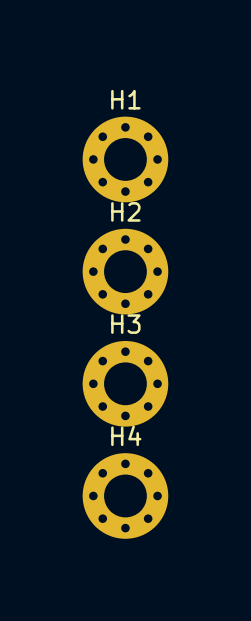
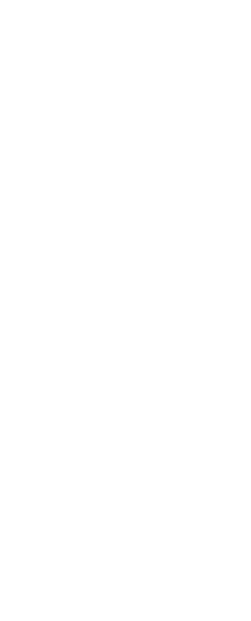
H1: (125, 159) -> none
H2: (125, 271) -> none
H3: (125, 383) -> none
H4: (125, 495) -> none

